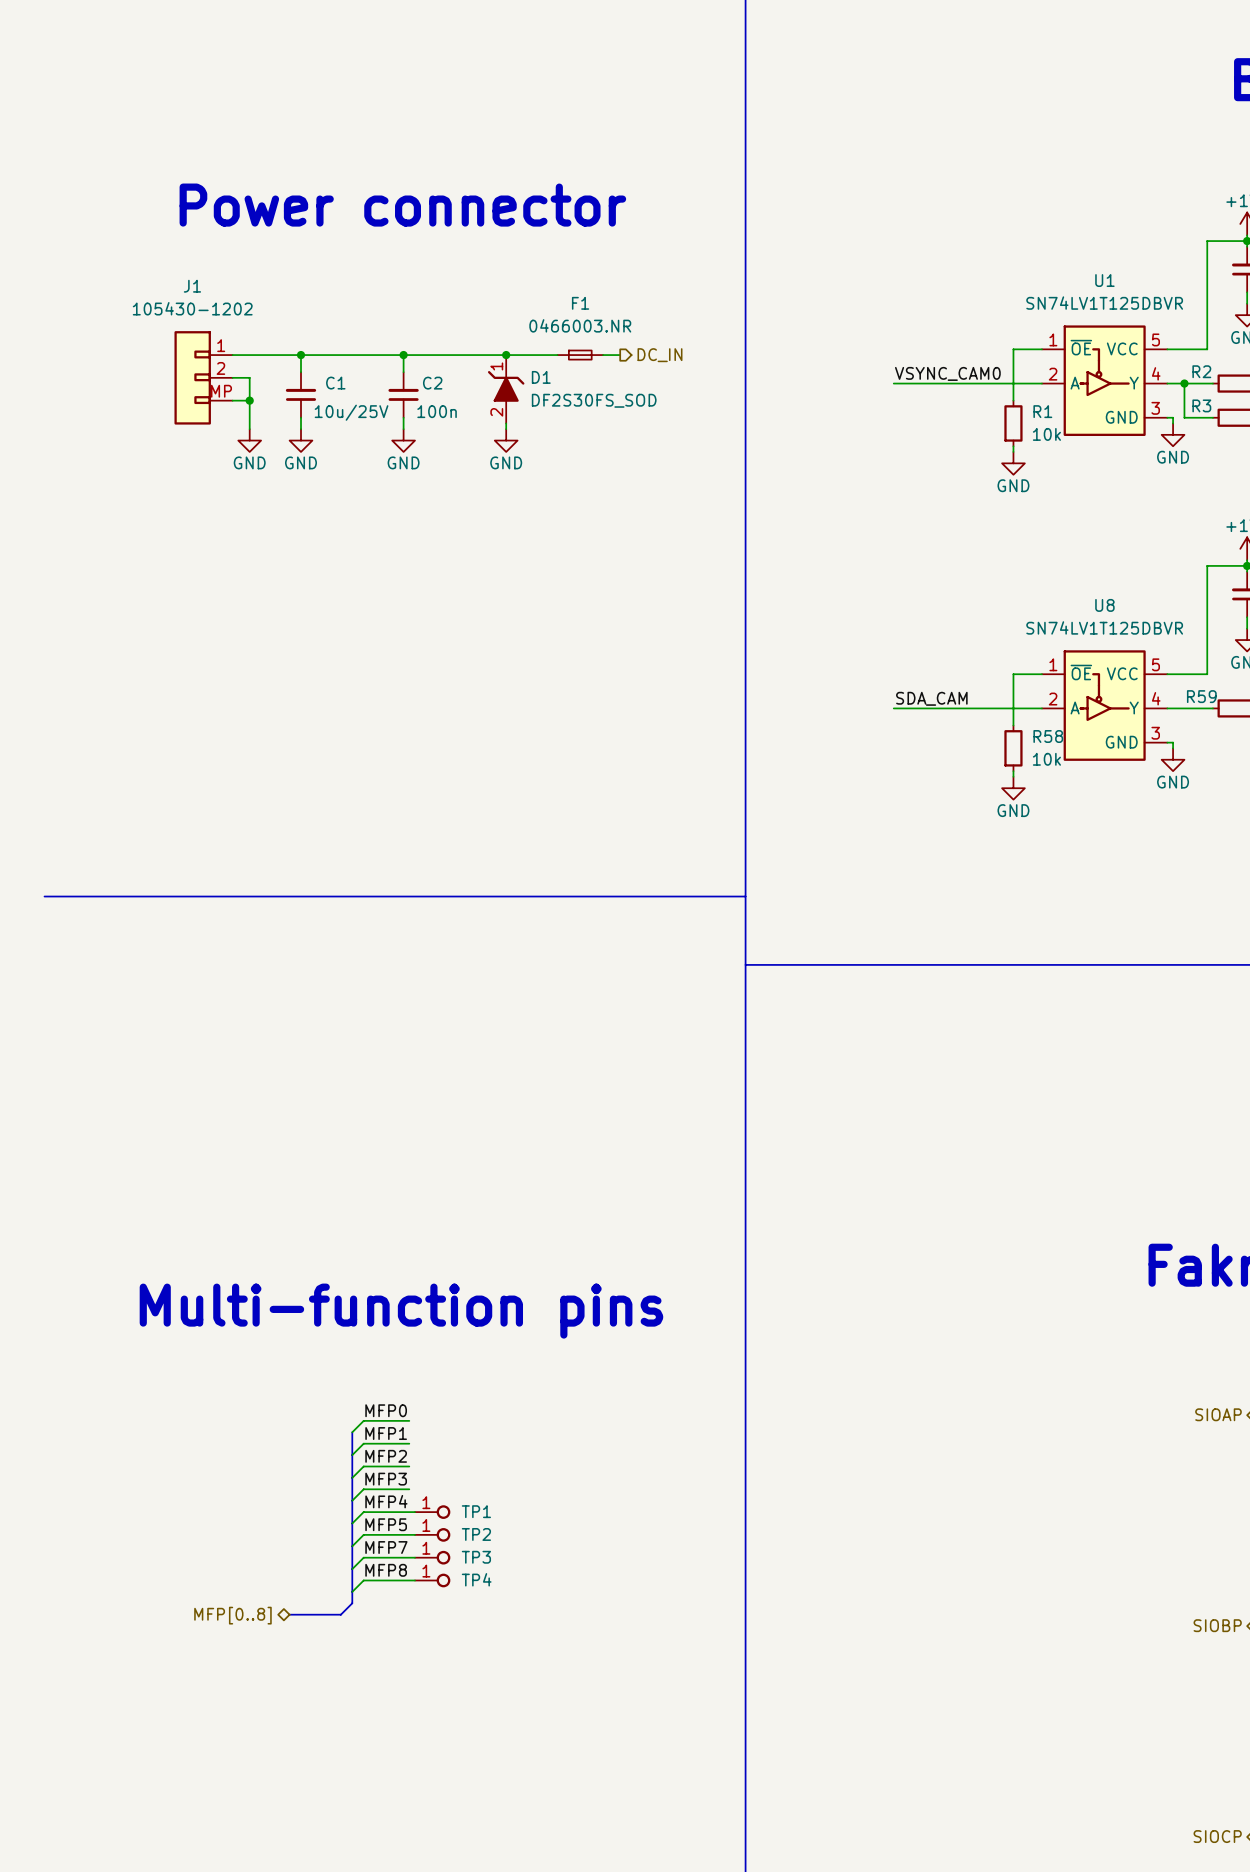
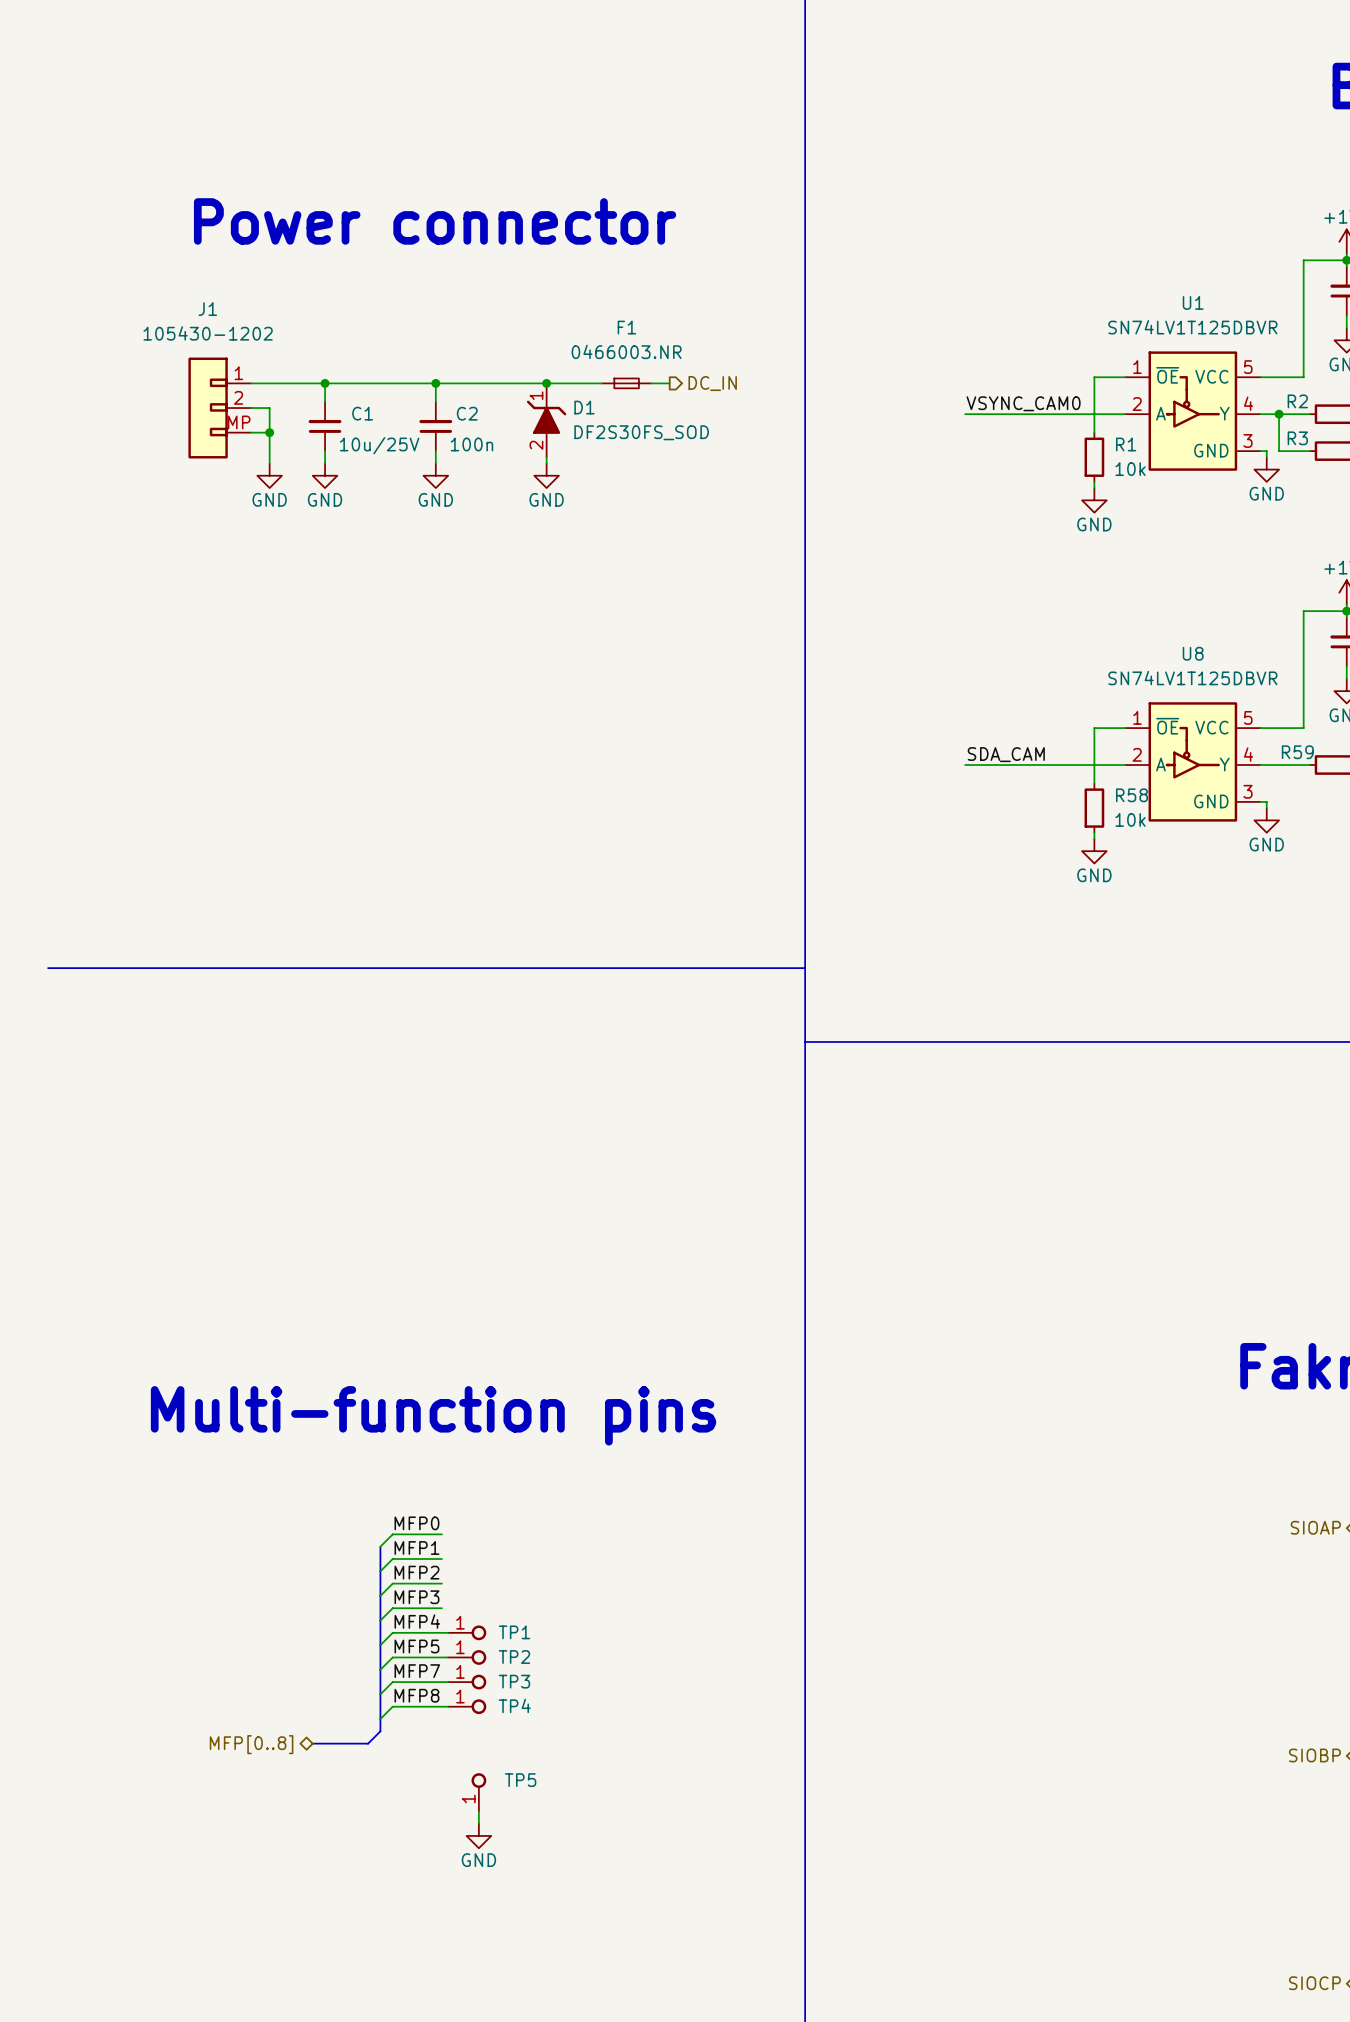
TP5: none -> (478, 1792)
wire: none -> (478, 1811) (478, 1823)
power symbol: none -> GND (478, 1835)

